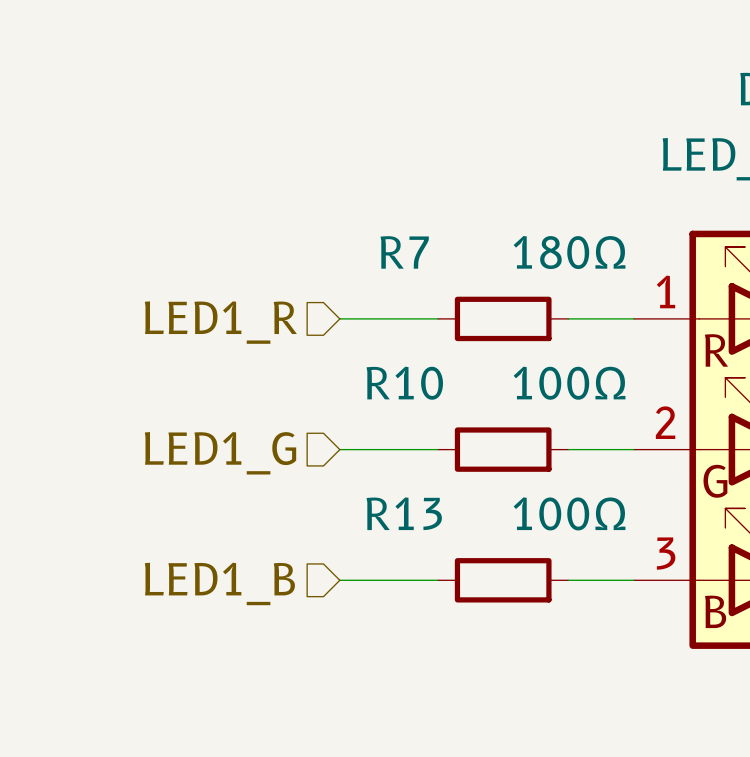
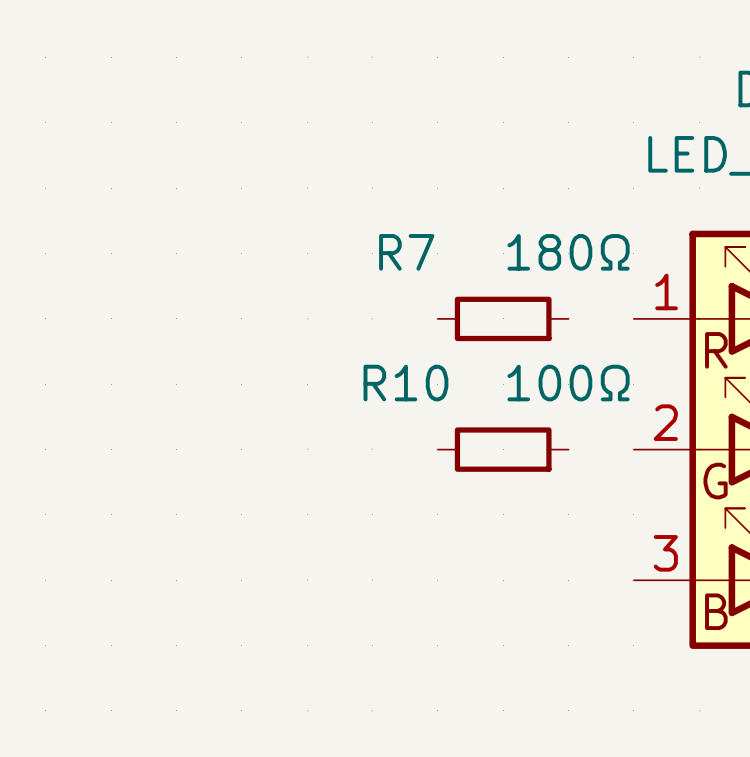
wire: (339, 318) (437, 318) -> none
wire: (568, 318) (633, 318) -> none
hierarchical label: LED1_R (220, 322) -> none
wire: (339, 449) (437, 449) -> none
wire: (568, 449) (633, 449) -> none
hierarchical label: LED1_G (220, 453) -> none
wire: (339, 580) (437, 580) -> none
R13: 100Ω (503, 580) -> none
wire: (568, 580) (633, 580) -> none
hierarchical label: LED1_B (219, 583) -> none

